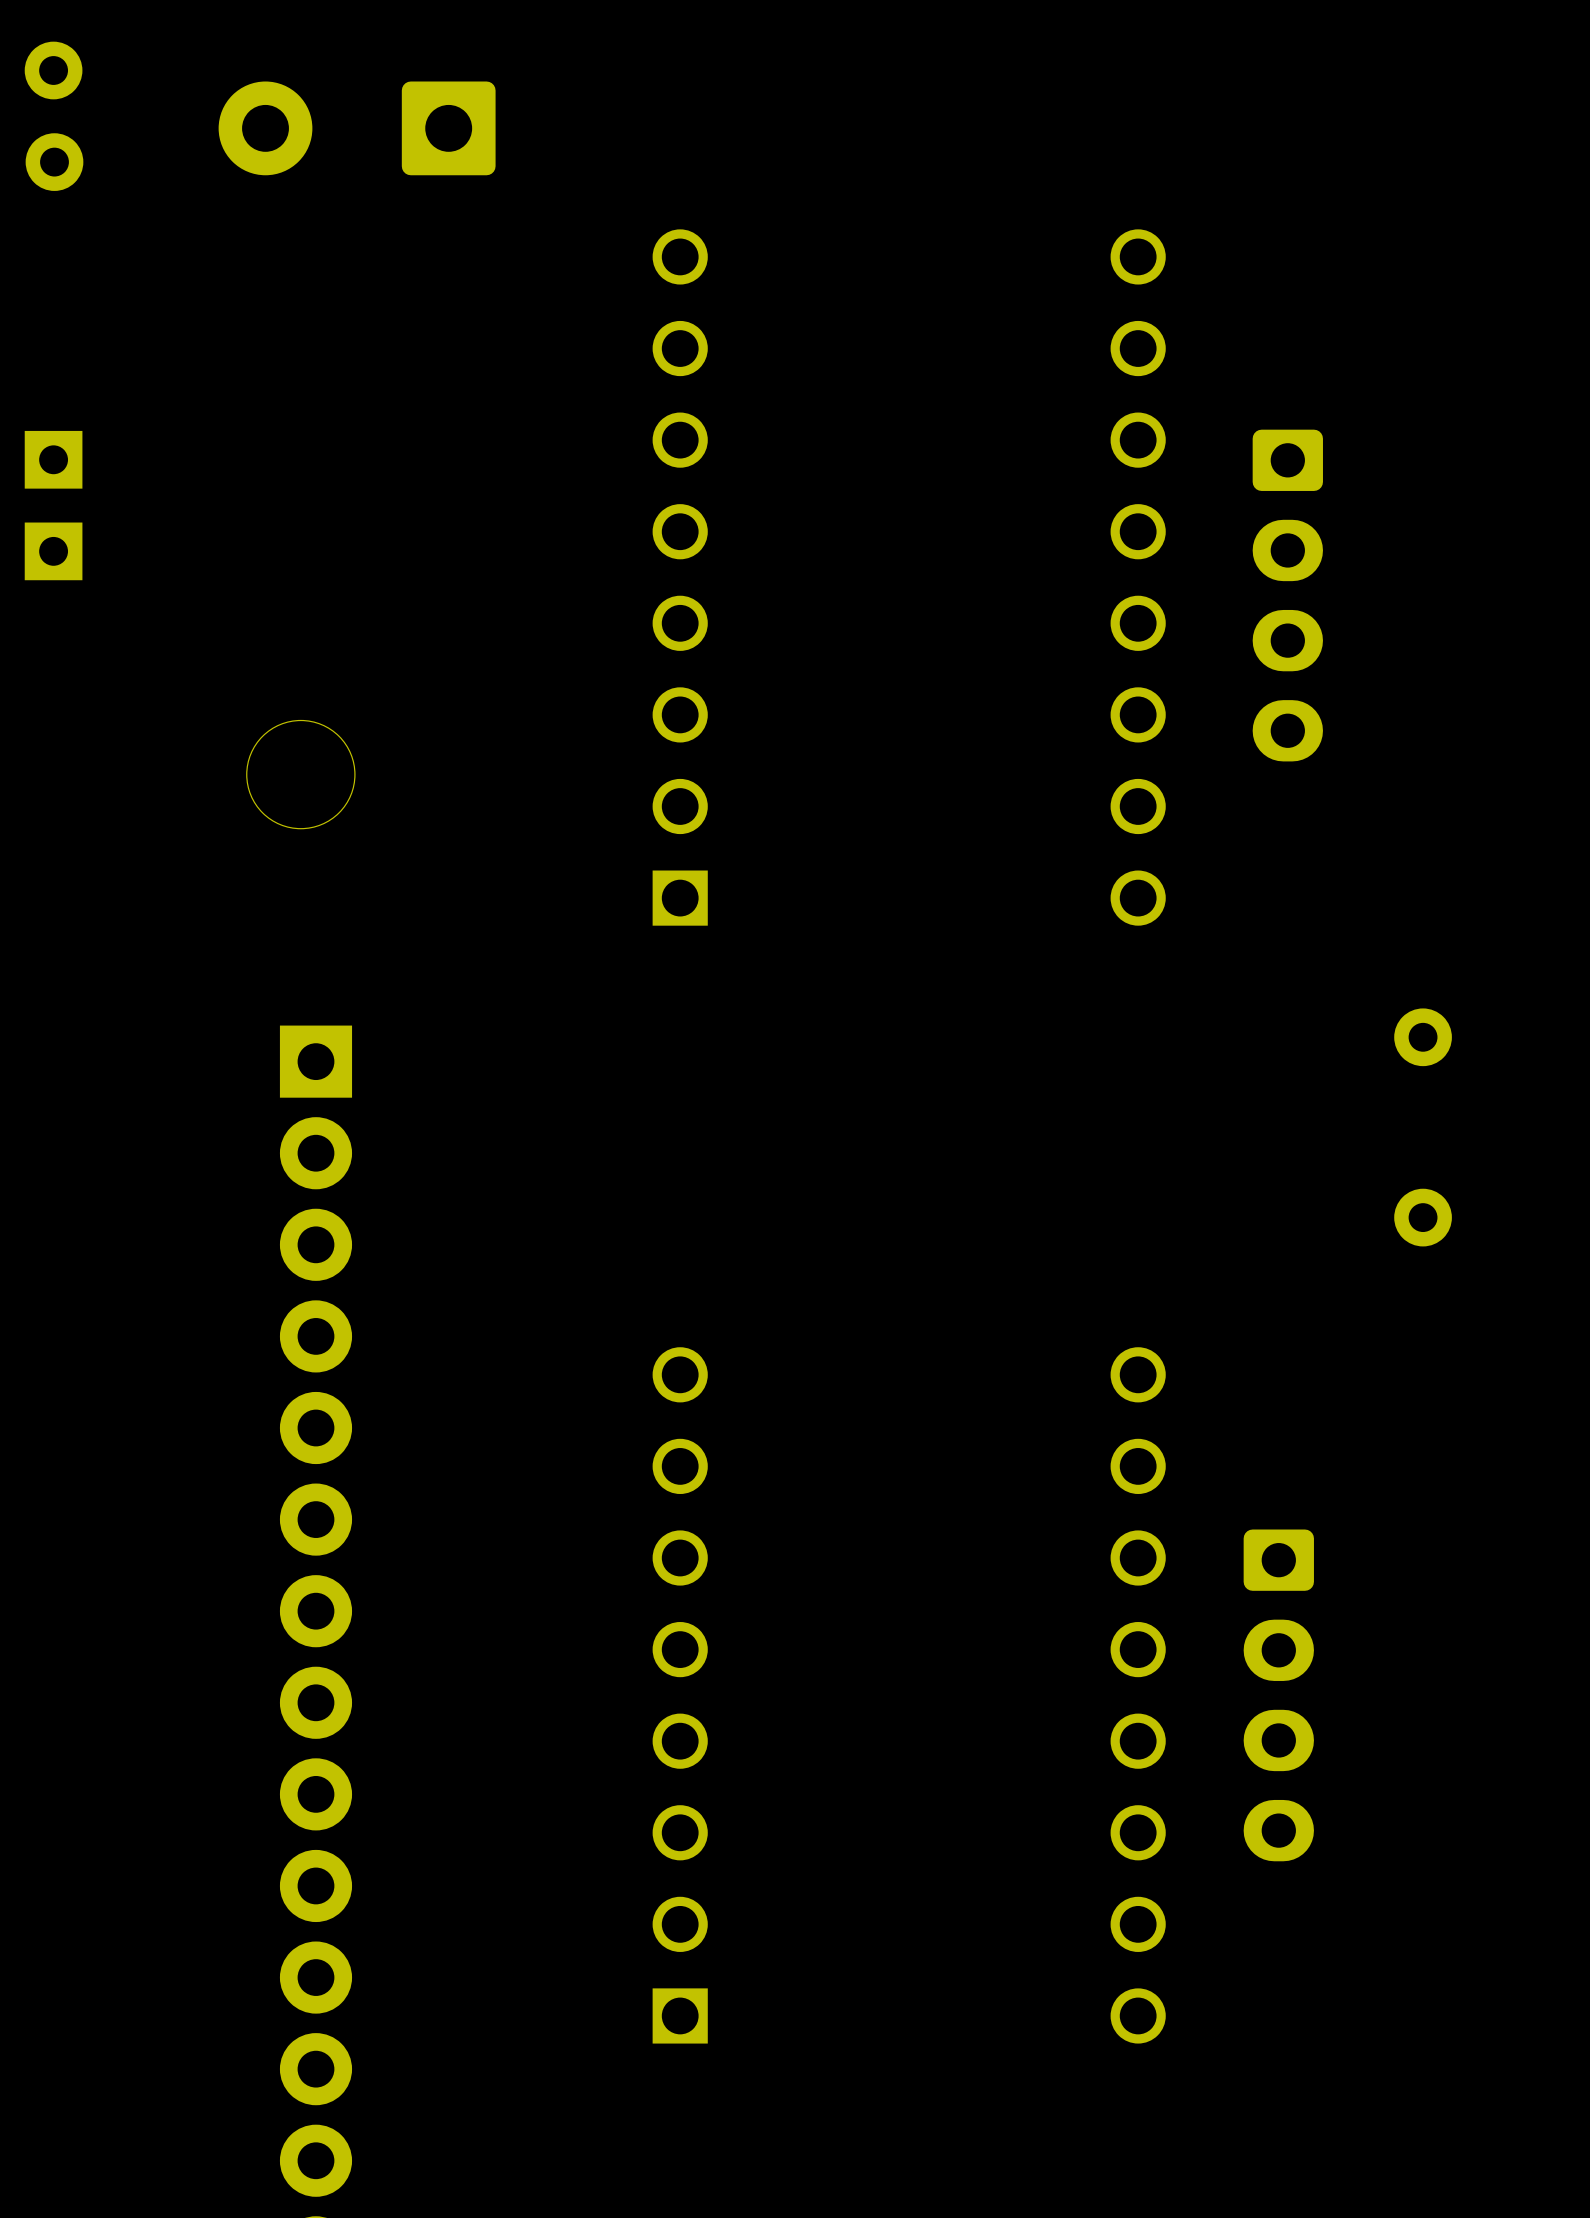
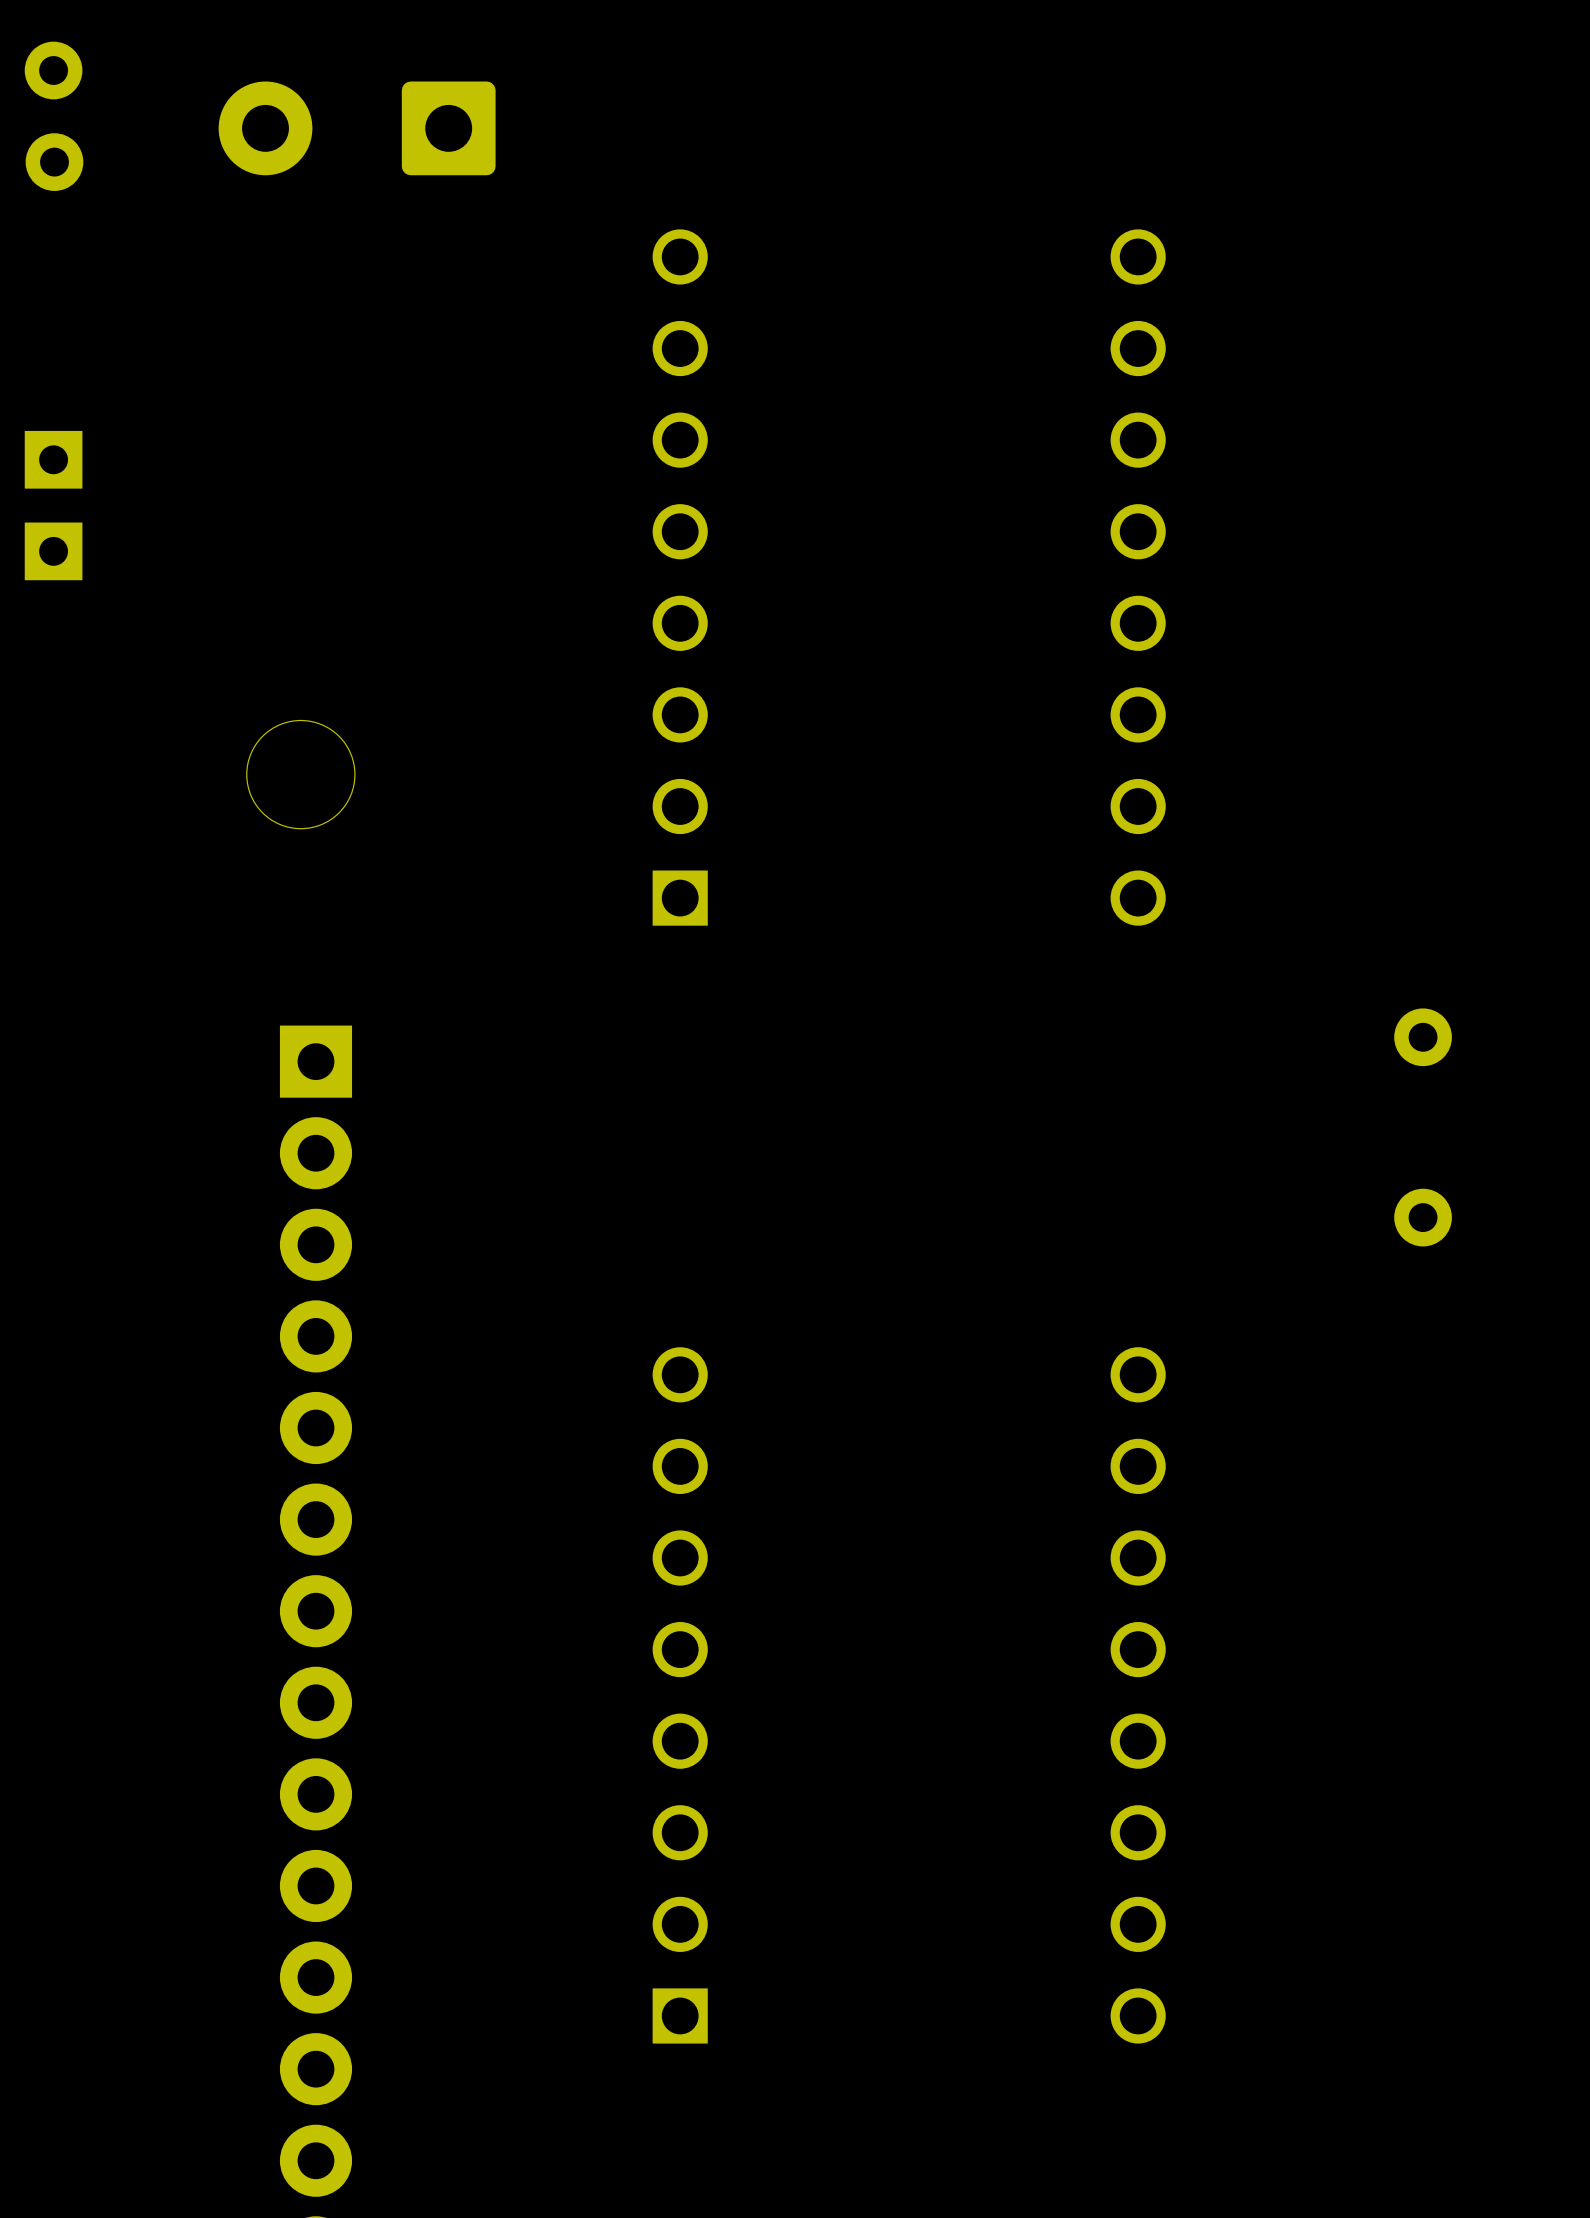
part: (1287, 595) -> none
part: (1278, 1695) -> none

